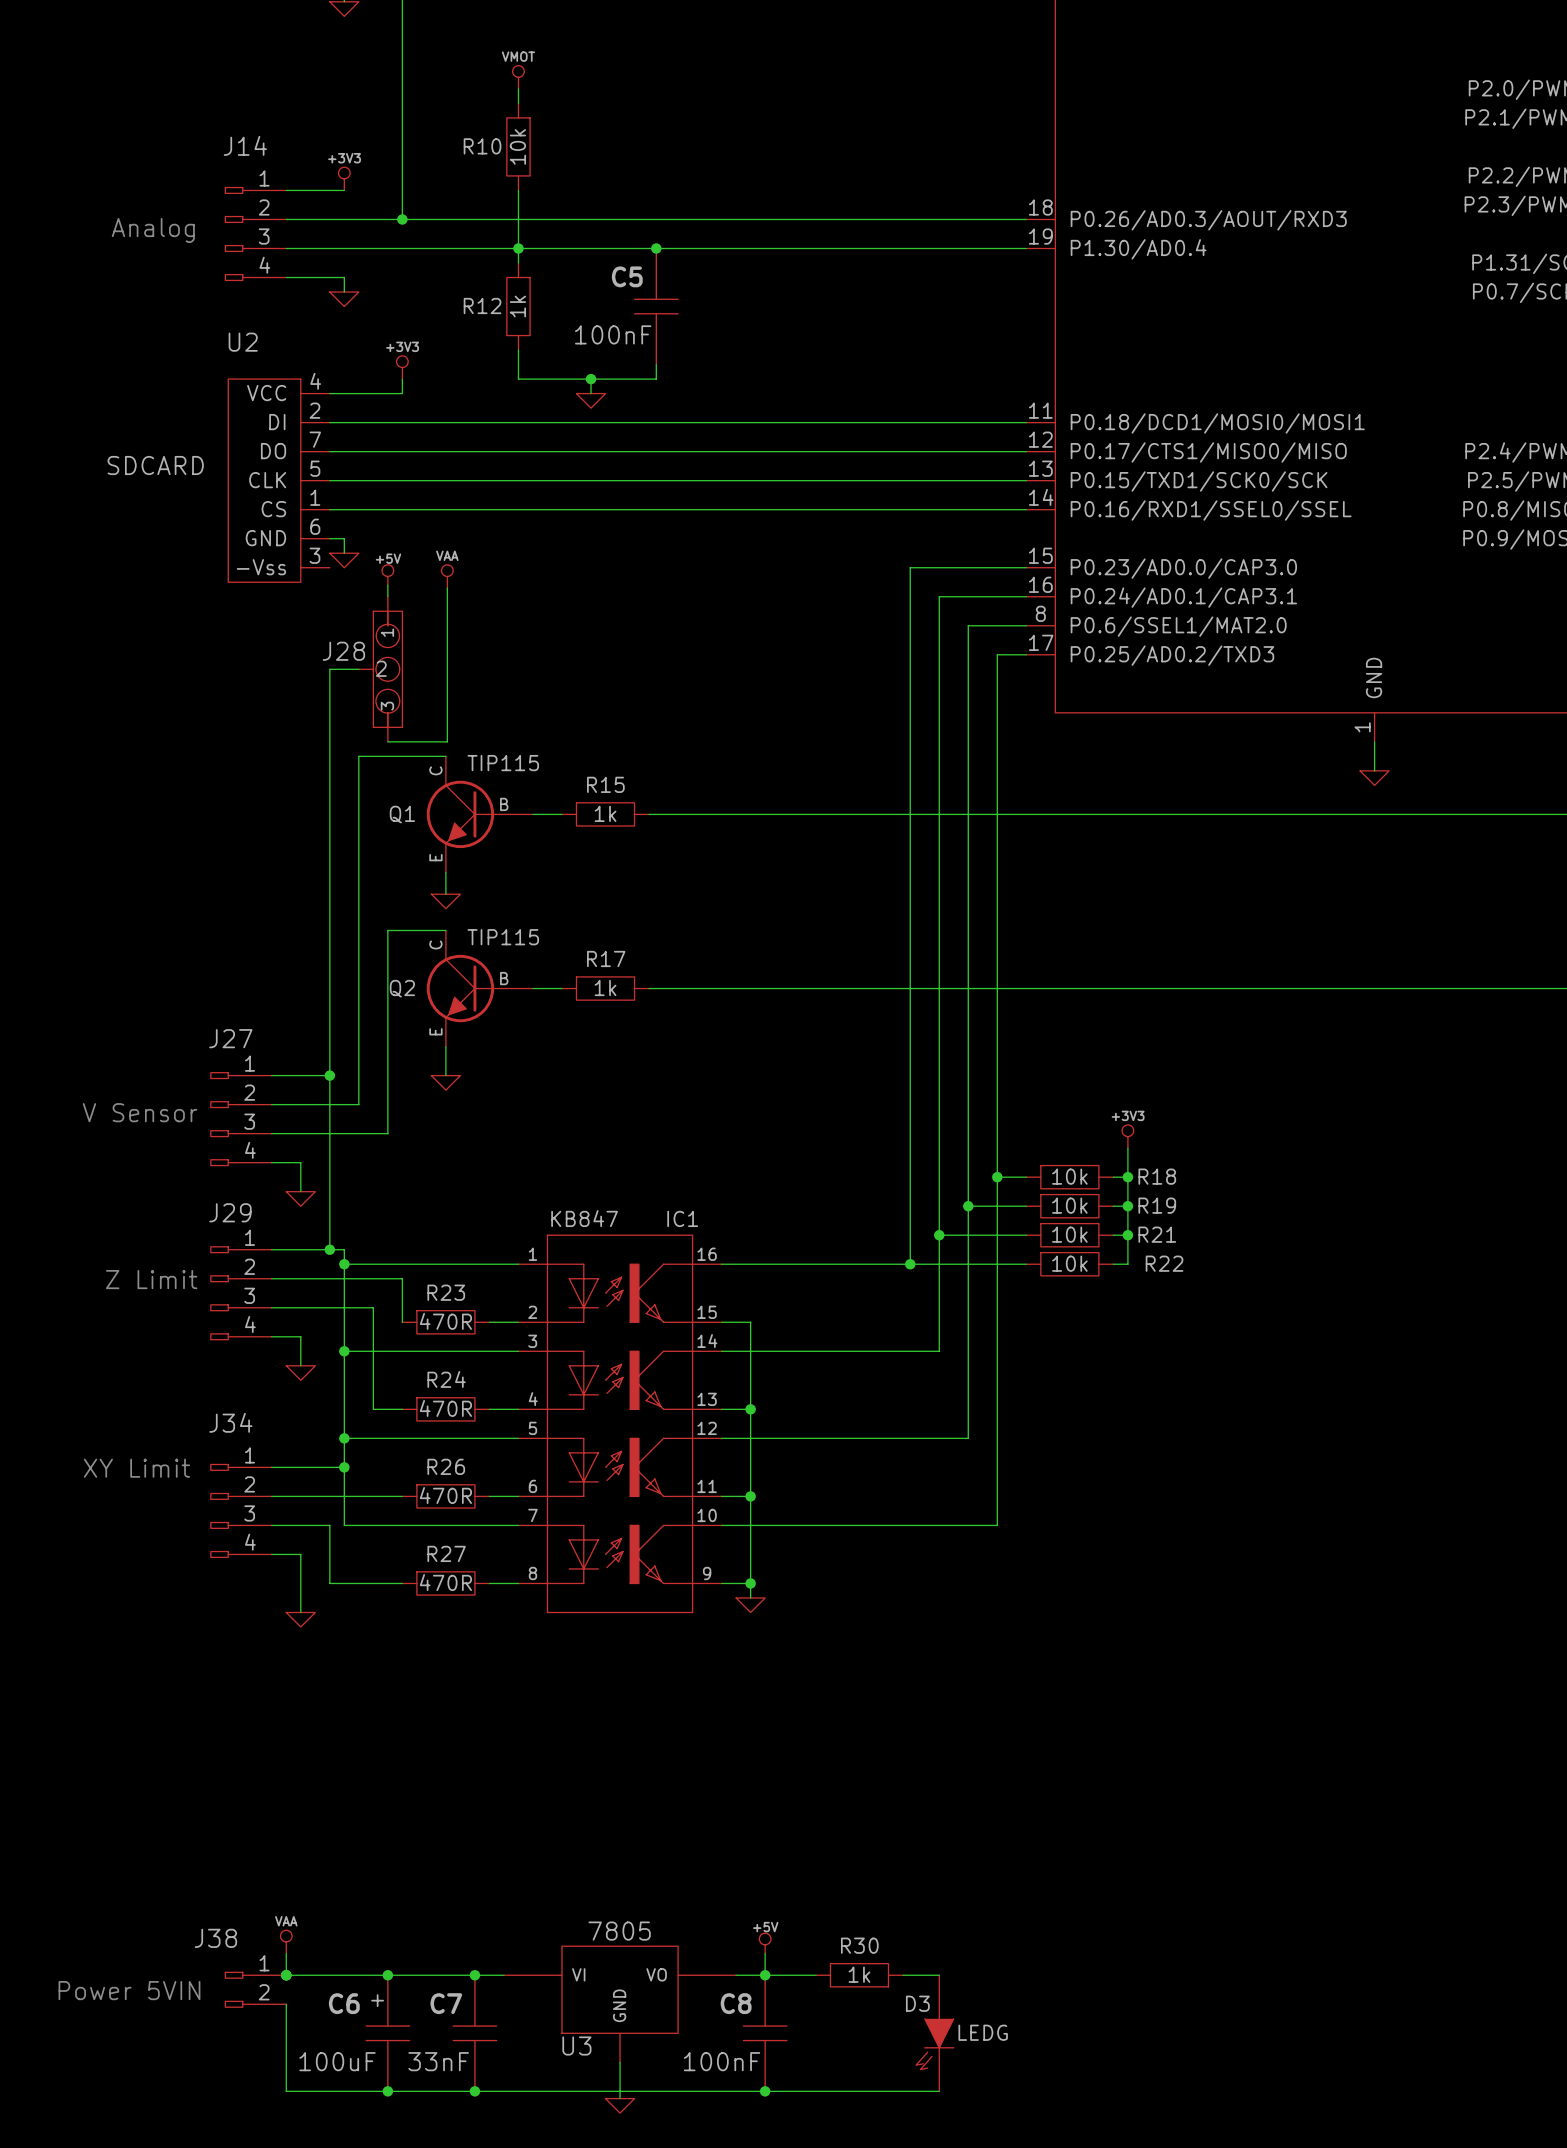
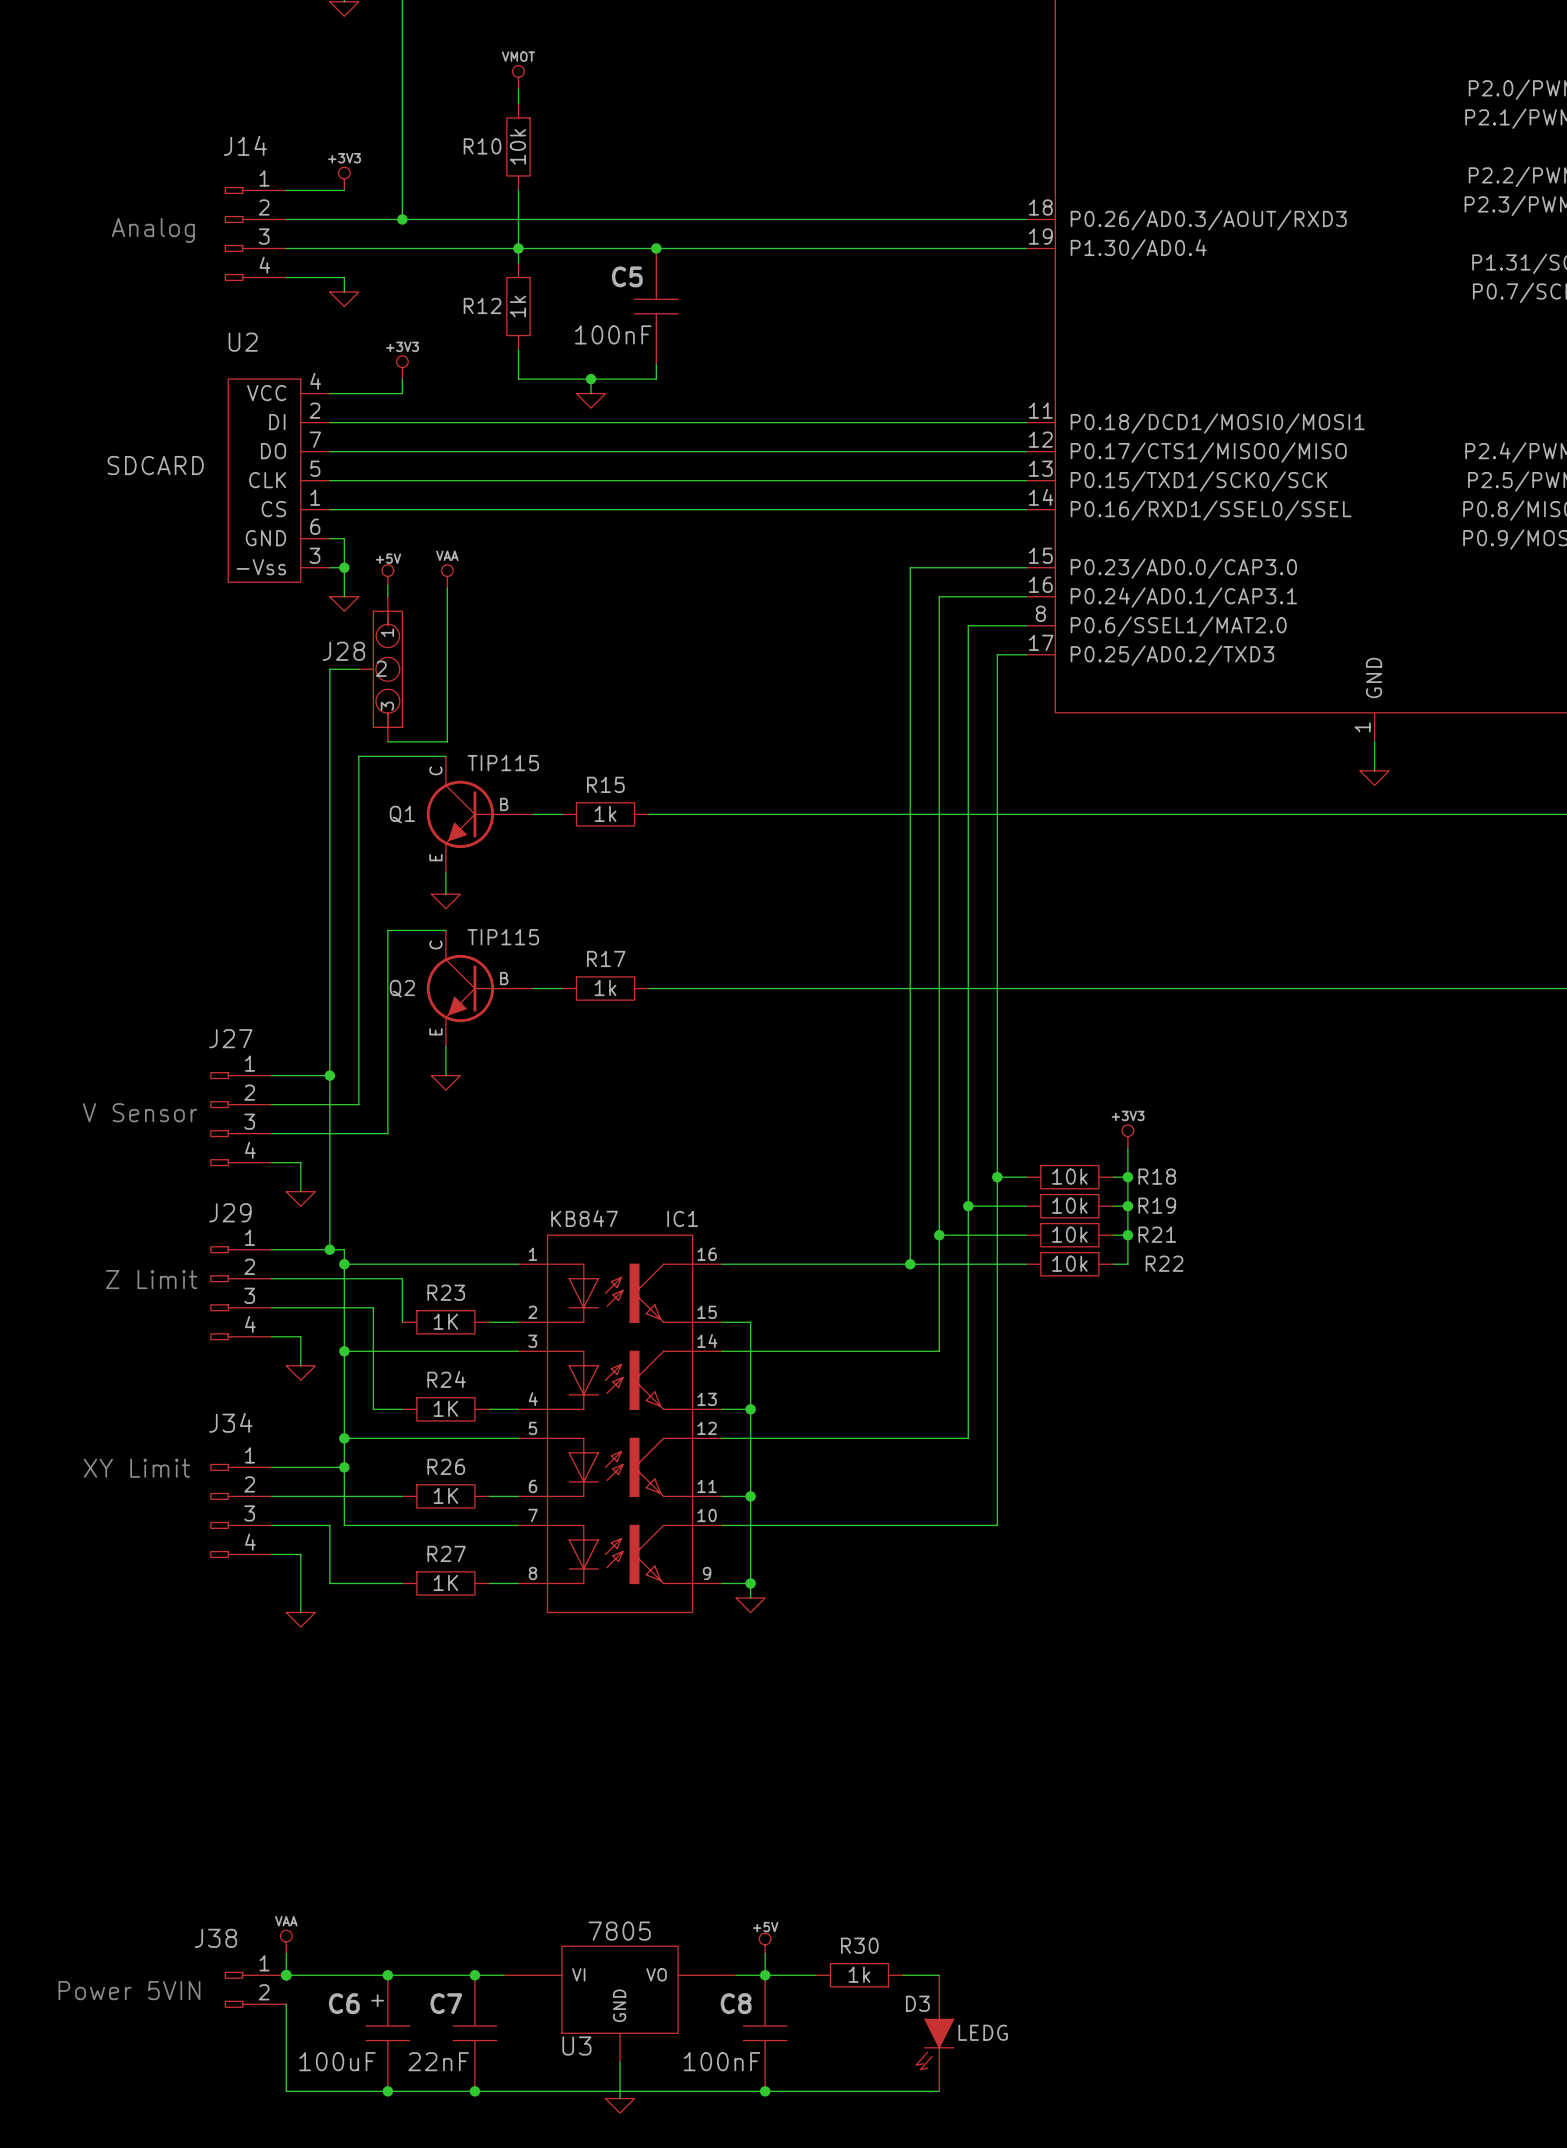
wire: none -> (344, 553) (344, 596)
power symbol position: (344, 560) -> (344, 604)
wire: none -> (329, 567) (344, 567)
junction: none -> (344, 567)
R23 value: 470R (445, 1321) -> 1K (445, 1321)
R24 value: 470R (445, 1408) -> 1K (445, 1408)
R26 value: 470R (445, 1495) -> 1K (445, 1495)
R27 value: 470R (445, 1582) -> 1K (445, 1582)
C7 value: 33nF (438, 2061) -> 22nF (438, 2061)

